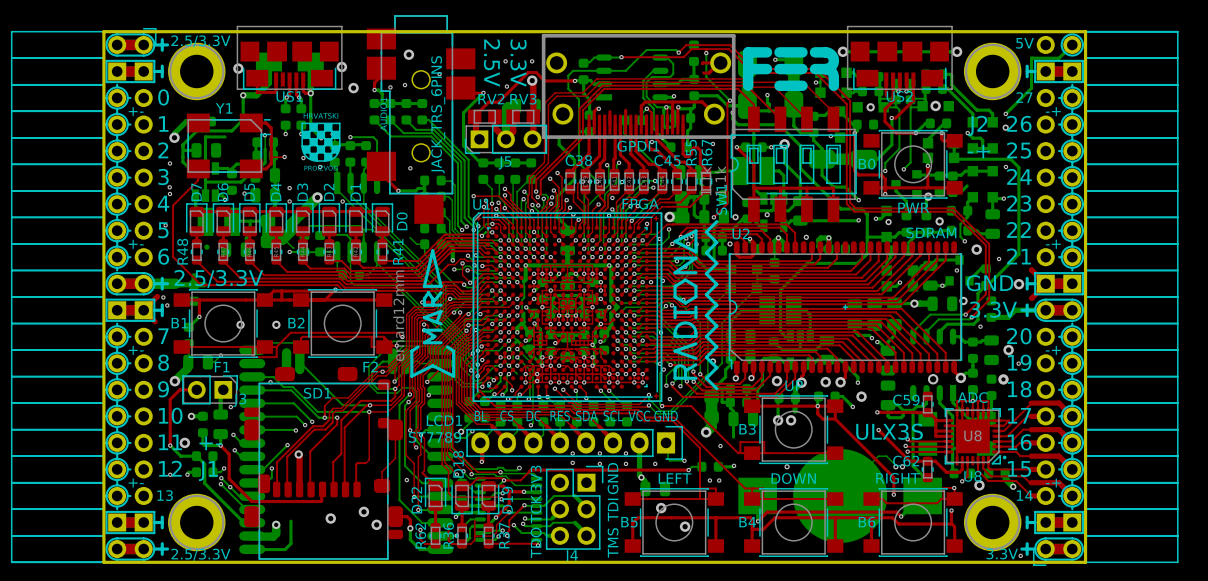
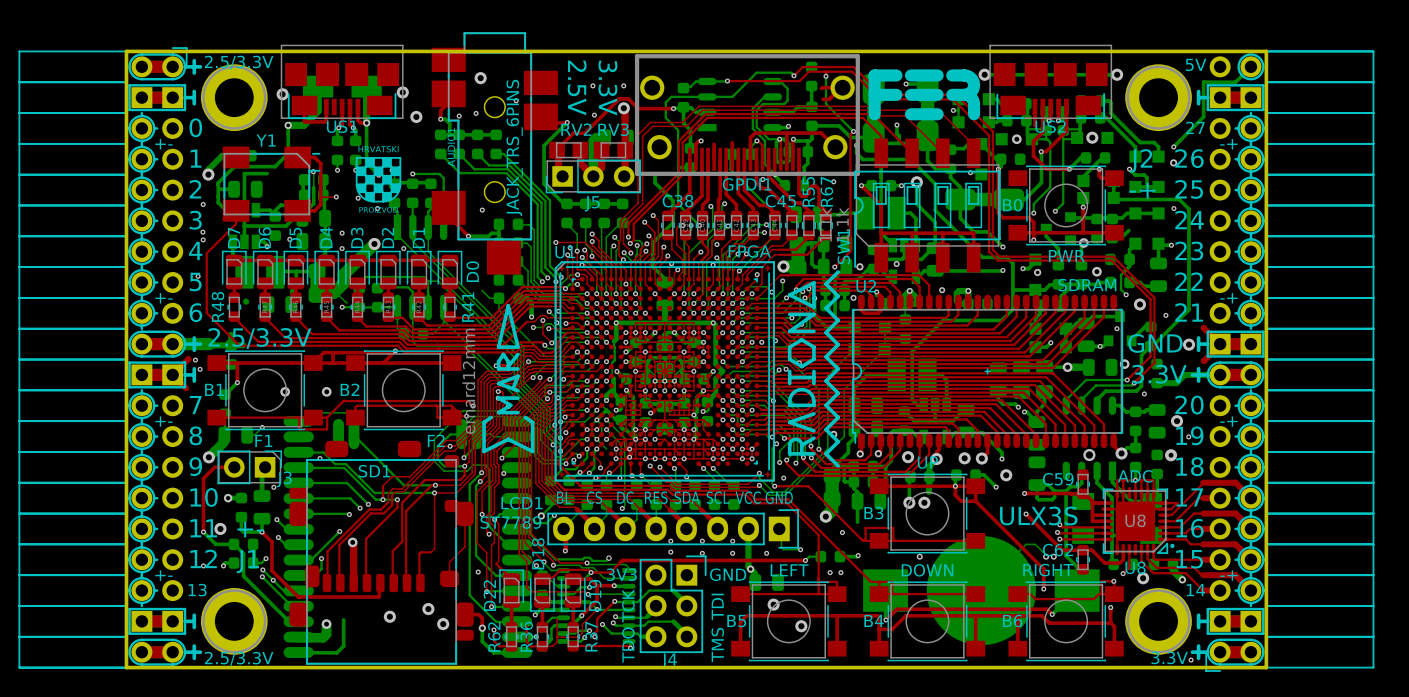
text rotation: 0° (536, 478) -> 90° clockwise (621, 574)
text rotation: 0° (613, 478) -> 90° clockwise (728, 574)

